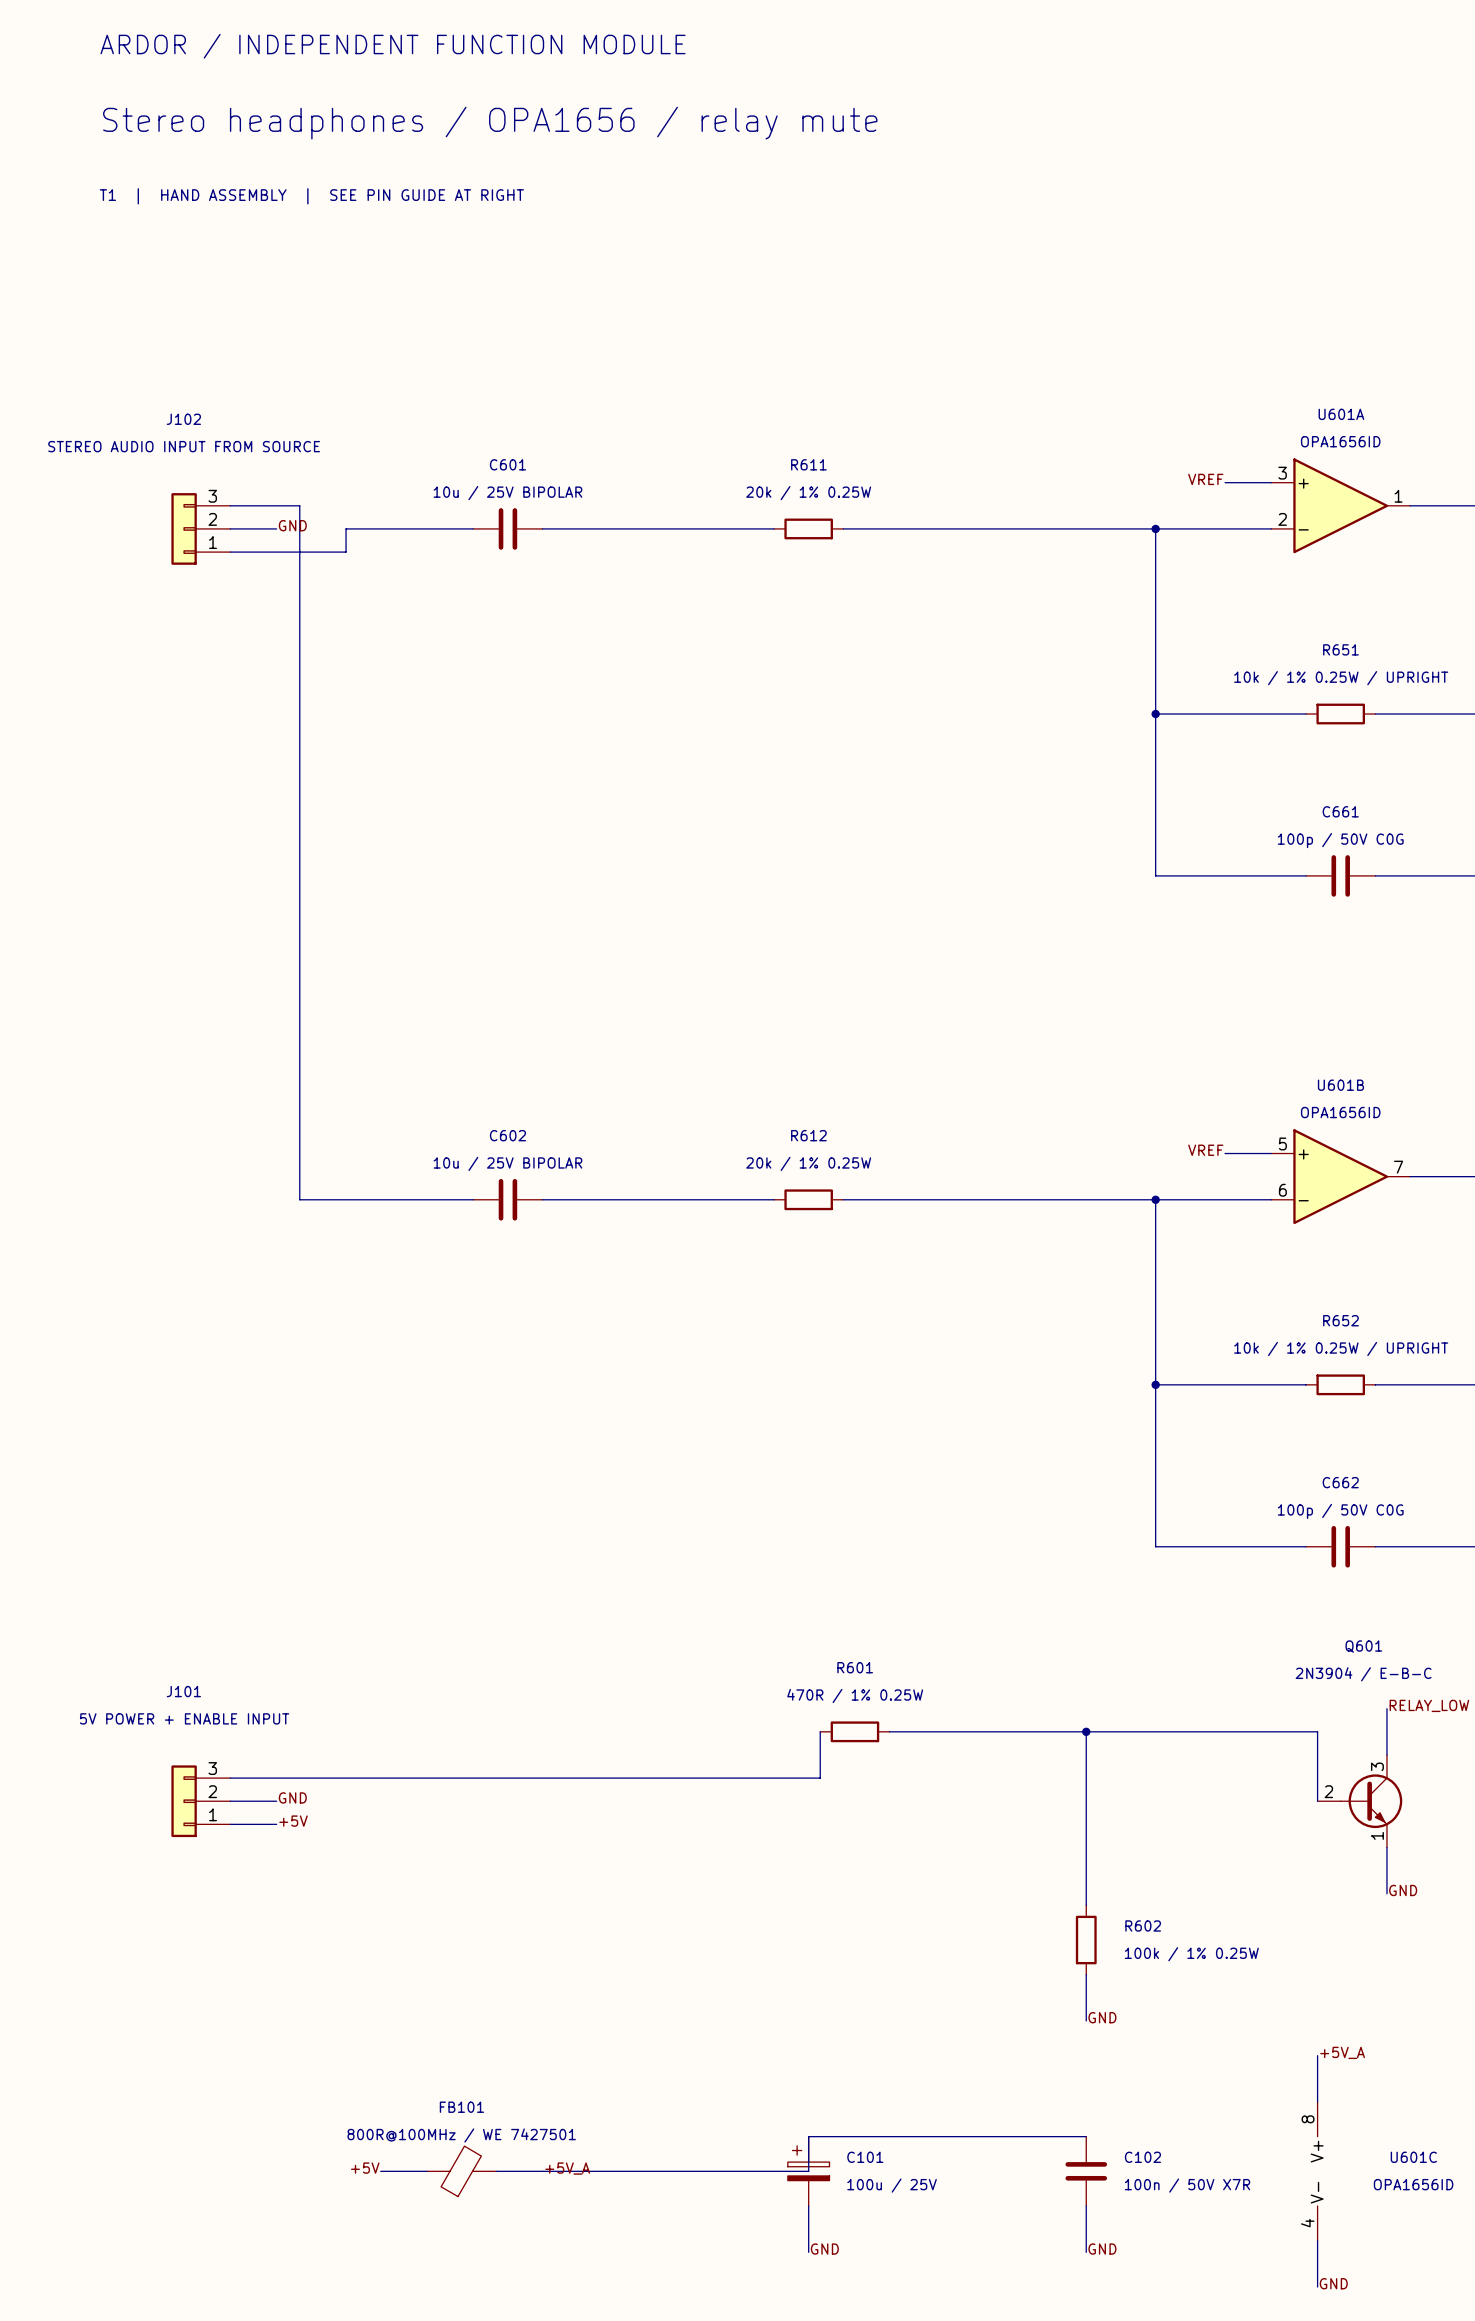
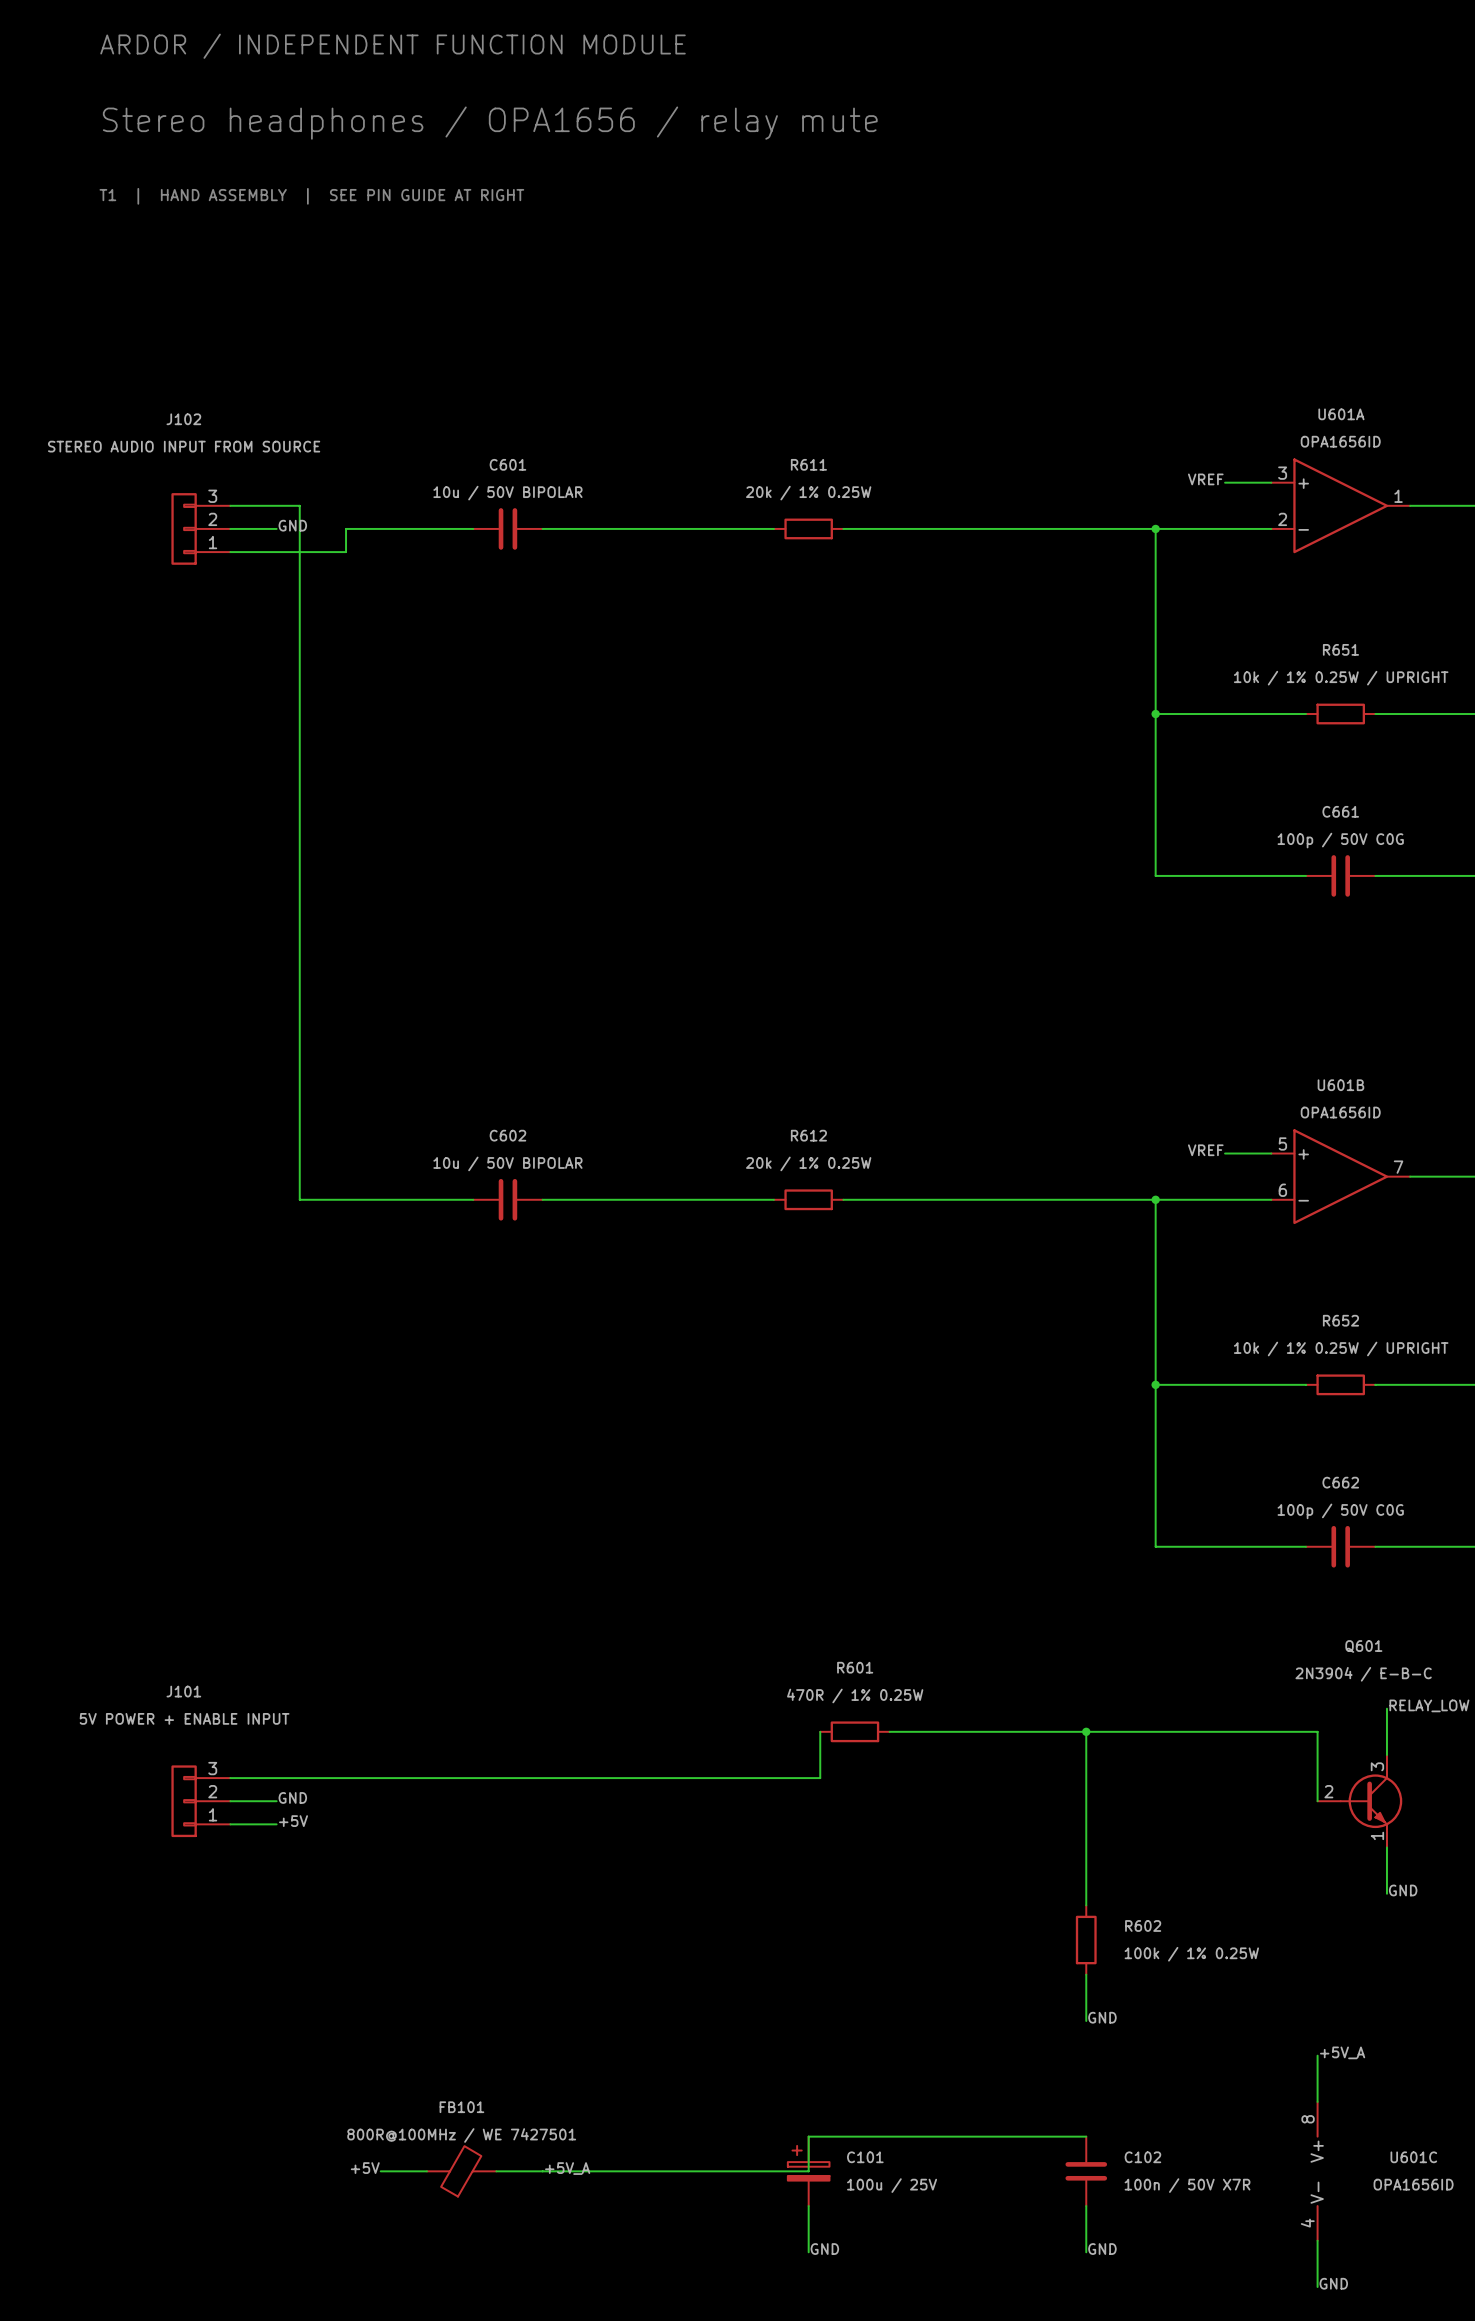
C601 value: 10u / 25V BIPOLAR (507, 493) -> 10u / 50V BIPOLAR (507, 493)
C602 value: 10u / 25V BIPOLAR (507, 1163) -> 10u / 50V BIPOLAR (507, 1163)

